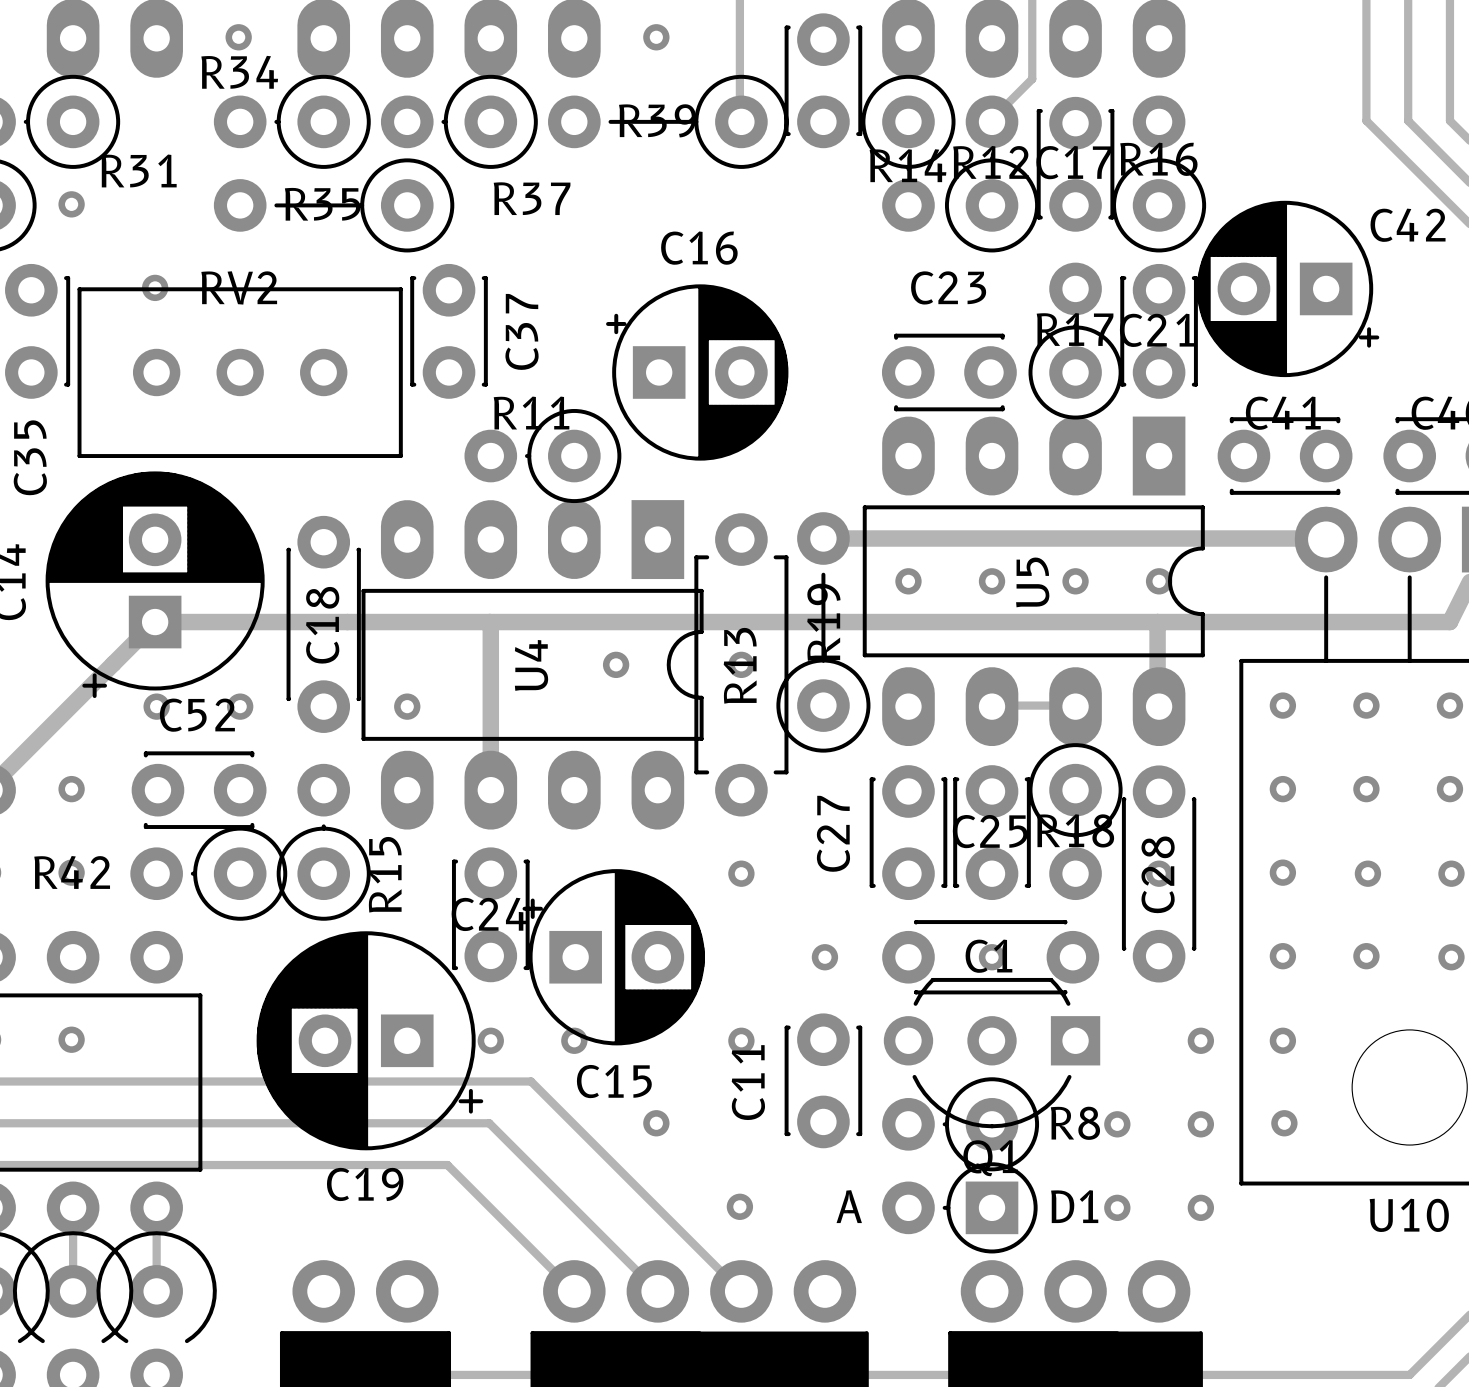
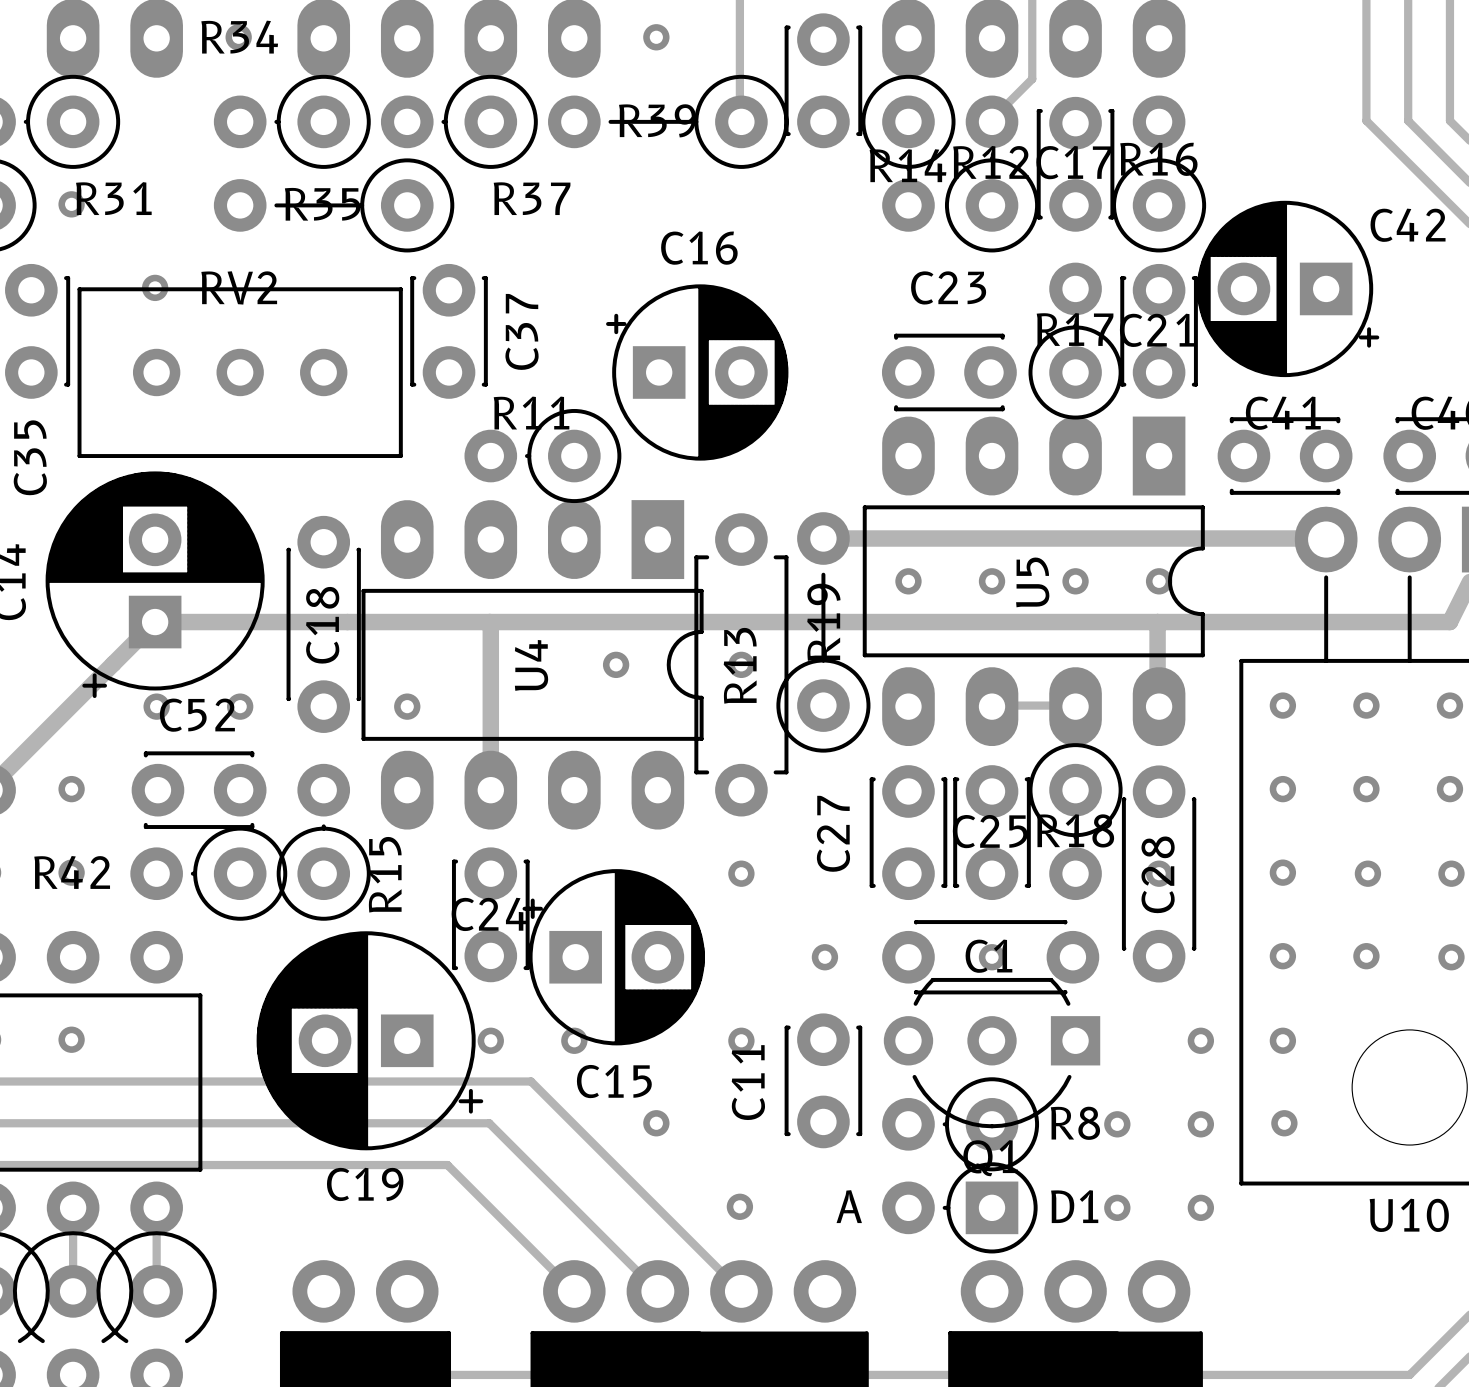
R34 name position: R34 (239, 72) -> R34 (239, 37)
R31 name position: R31 (138, 170) -> R31 (113, 198)

